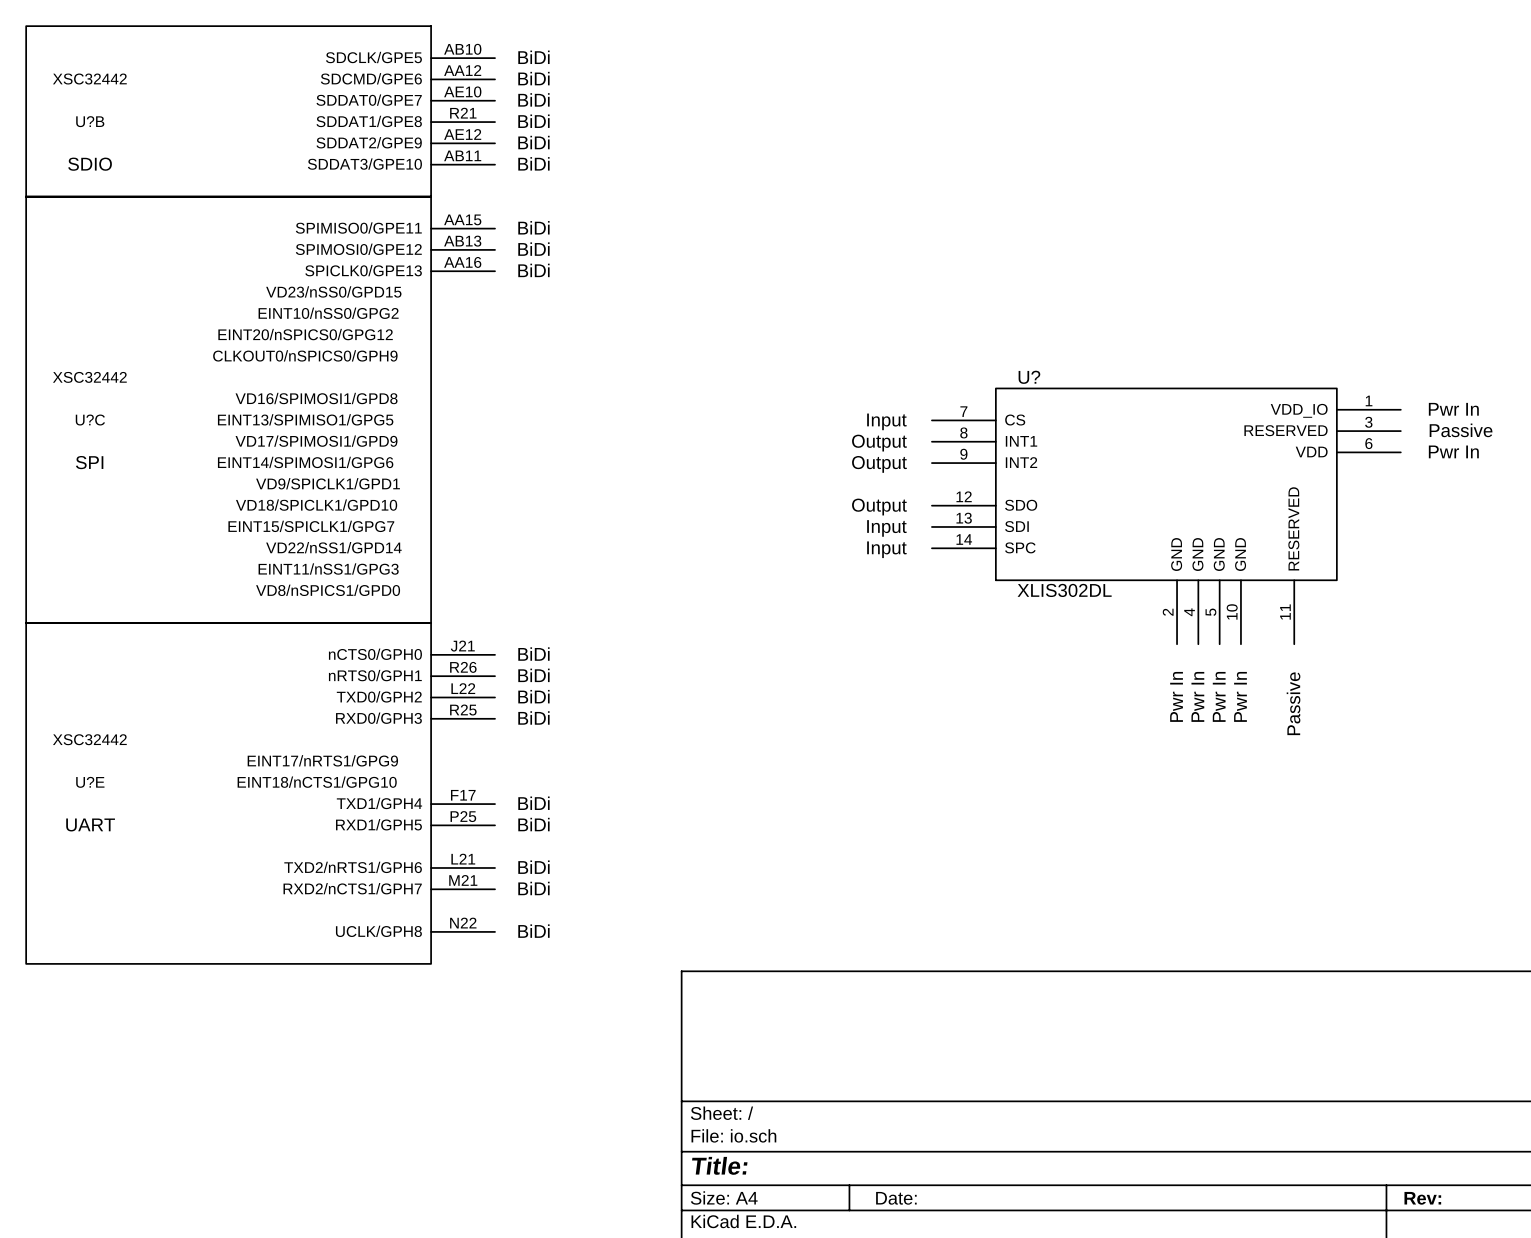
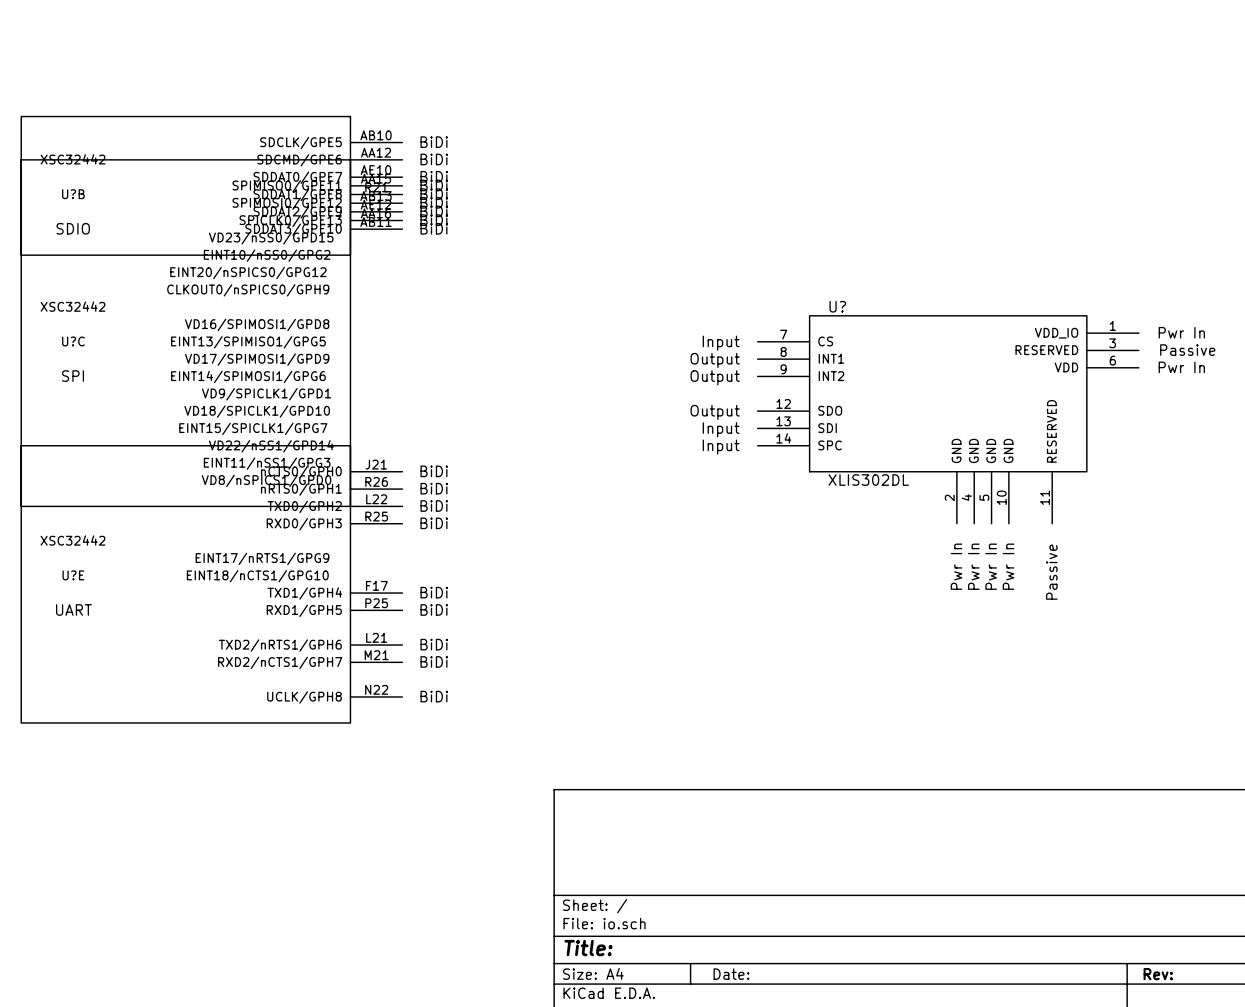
U?B position: (260, 111) -> (211, 185)
U?E position: (260, 793) -> (211, 584)

